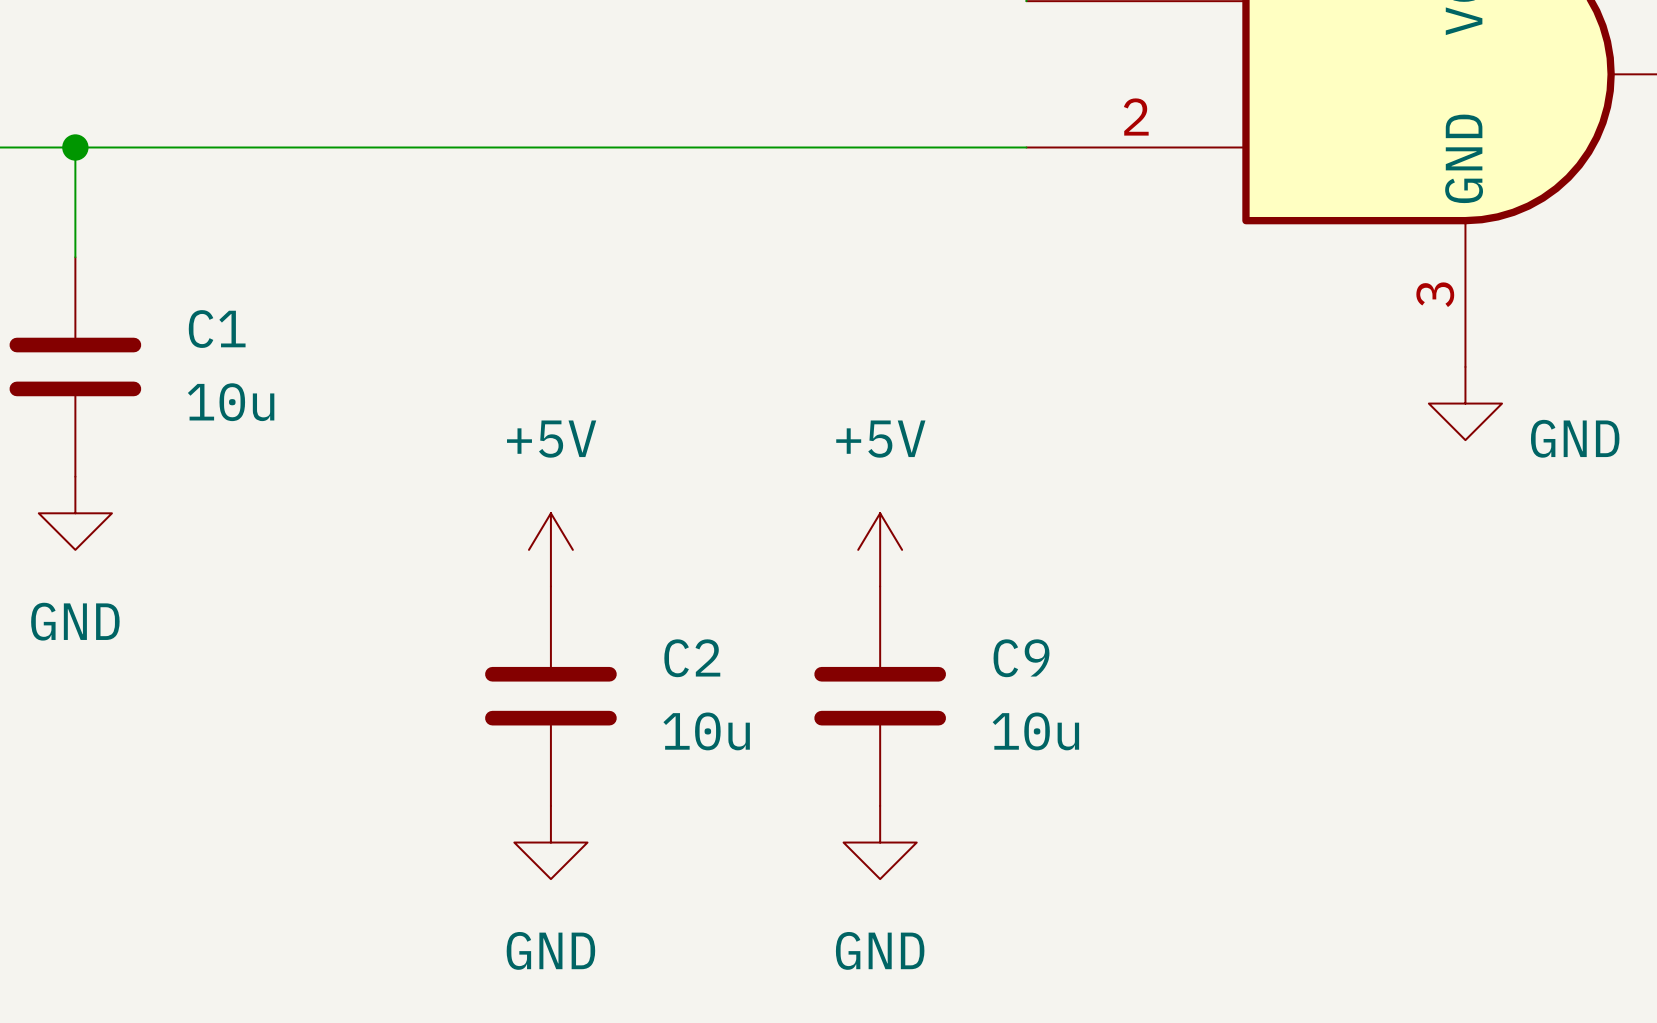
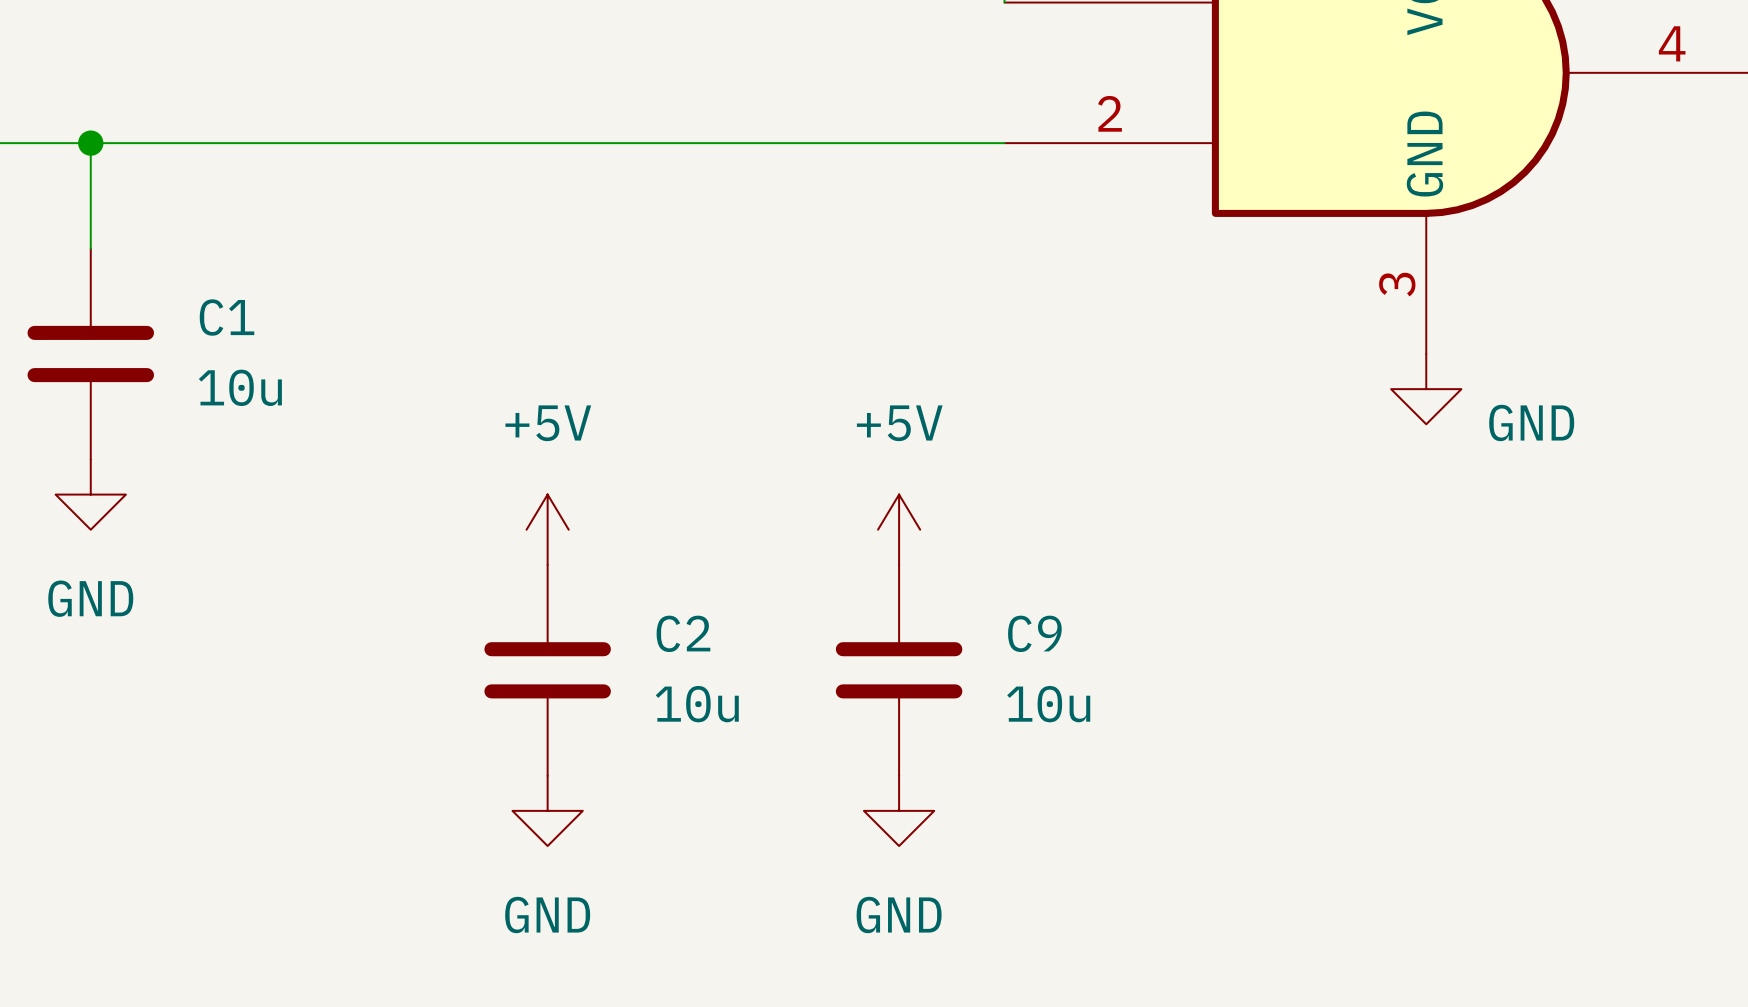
power symbol position: +5V (880, 549) -> +5V (899, 529)
C9 position: (880, 696) -> (899, 670)
power symbol position: GND (880, 842) -> GND (899, 810)

